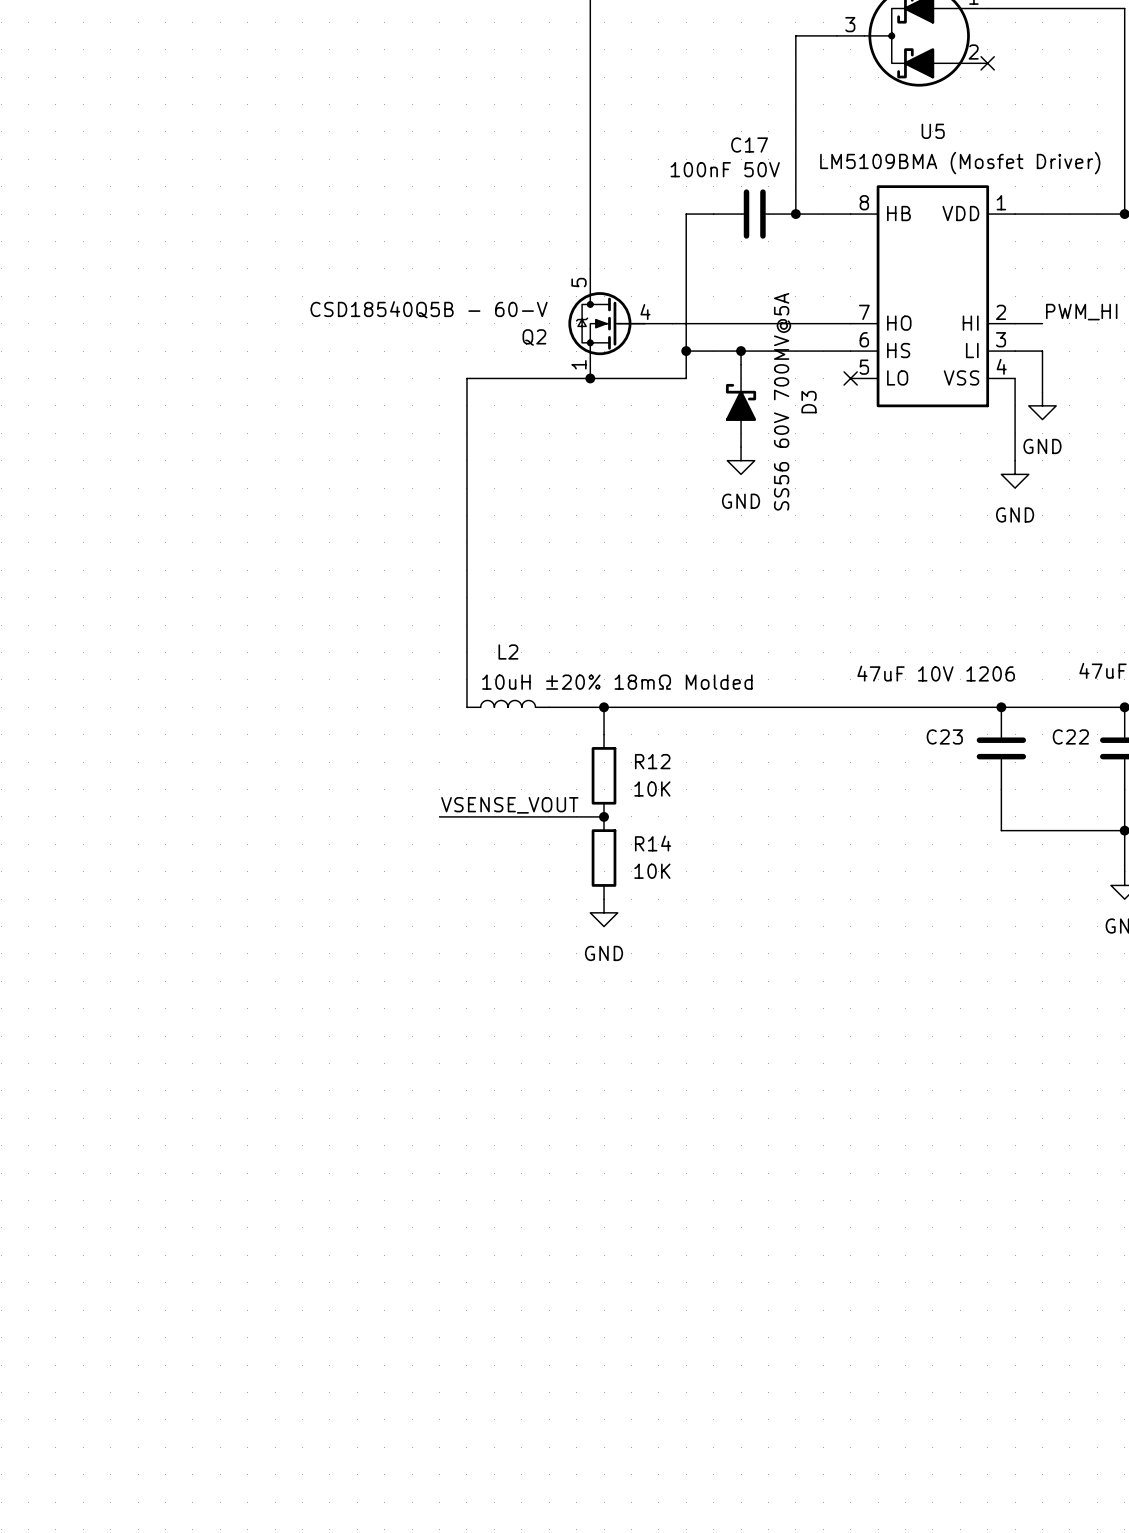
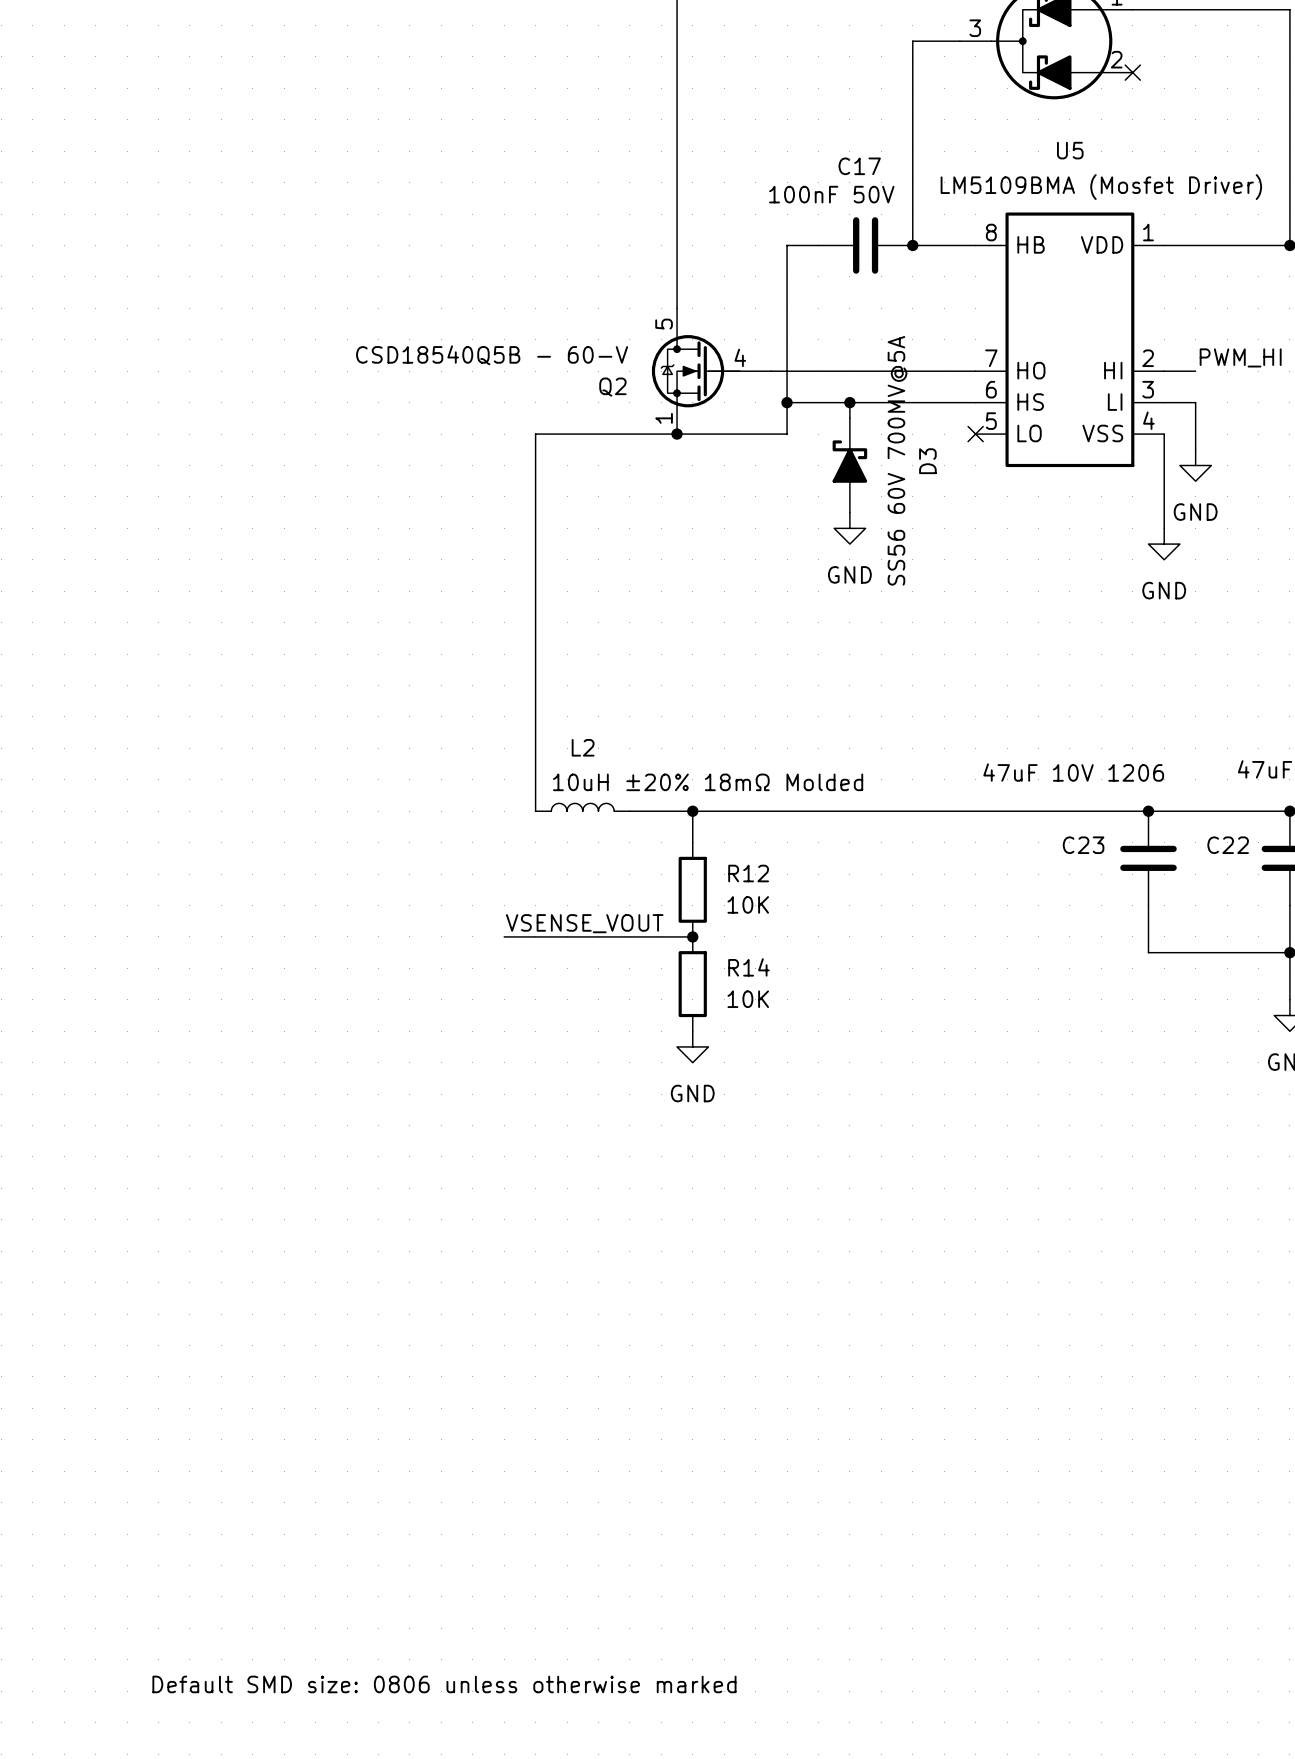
text: none -> Default SMD size: 0806 unless otherwise marked (444, 1684)

